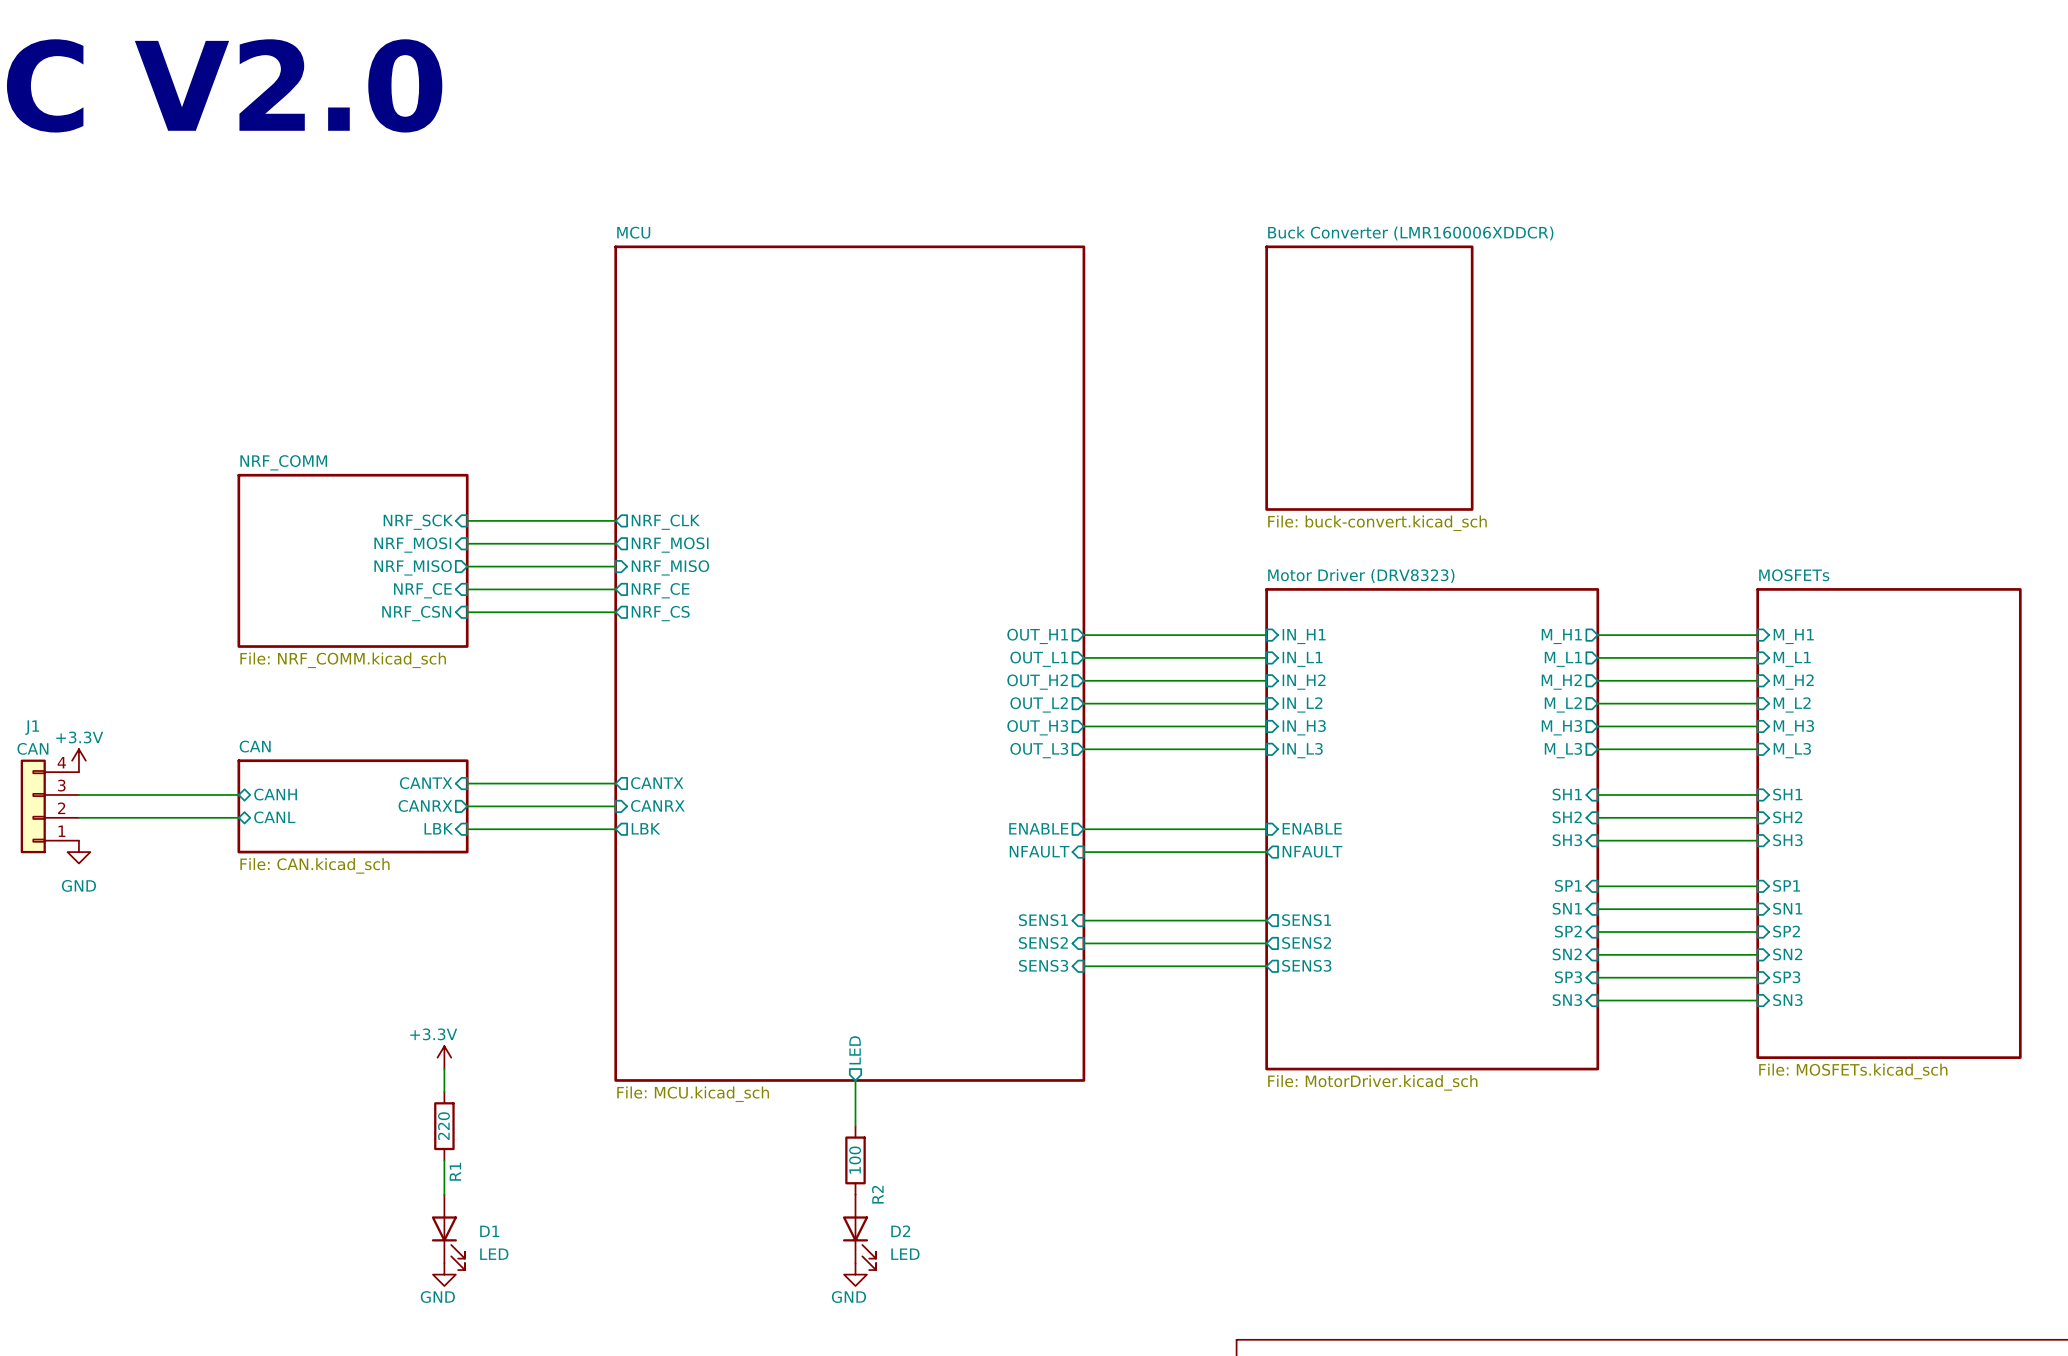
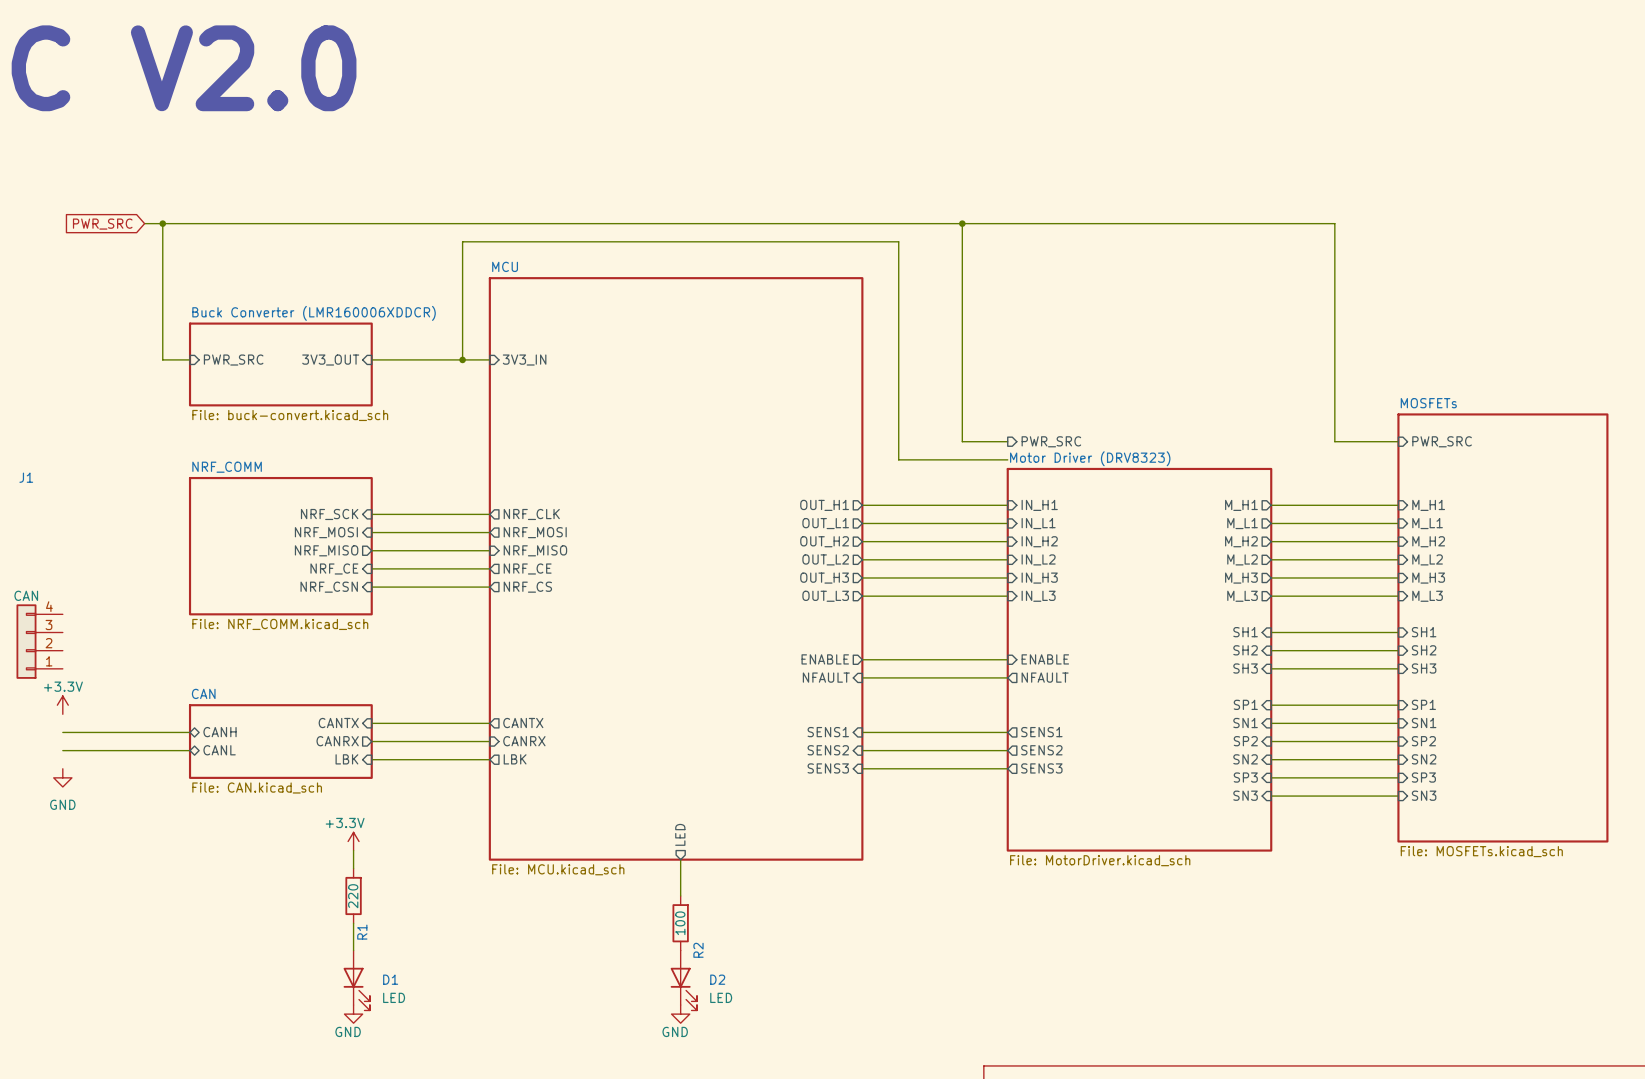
sheet Buck Converter (LMR160006XDDCR) name position: Buck Converter (LMR160006XDDCR) (1410, 233) -> Buck Converter (LMR160006XDDCR) (314, 313)
sheet Buck Converter (LMR160006XDDCR) shape: [1265, 245, 1474, 511] -> [188, 322, 373, 407]
wire: none -> (144, 223) (1334, 223) (1334, 441) (1398, 441)
wire: none -> (162, 223) (162, 359) (190, 359)
junction: none -> (162, 223)
wire: none -> (962, 223) (962, 441) (1007, 441)
junction: none -> (962, 223)
global label: none -> PWR_SRC (102, 224)
wire: none -> (371, 359) (489, 359)
wire: none -> (462, 359) (462, 241) (898, 241) (898, 459) (1007, 459)
junction: none -> (462, 359)
sheet pin: none -> PWR_SRC (233, 360)
sheet pin: none -> 3V3_OUT (330, 360)
sheet pin: none -> 3V3_IN (524, 360)
wire: (467, 520) (615, 520) -> (371, 514) (489, 514)
sheet pin position: NRF_SCK (418, 522) -> NRF_SCK (329, 514)
sheet pin position: NRF_CLK (665, 522) -> NRF_CLK (531, 514)
sheet Buck Converter (LMR160006XDDCR) value position: File: buck-convert.kicad_sch (1377, 523) -> File: buck-convert.kicad_sch (290, 415)
wire: (467, 543) (615, 543) -> (371, 532) (489, 532)
sheet pin: NRF_MOSI (412, 545) -> none
sheet pin: NRF_MOSI (670, 545) -> none
sheet pin: none -> PWR_SRC (1051, 441)
sheet pin: none -> PWR_SRC (1442, 441)
sheet NRF_COMM position: (353, 560) -> (280, 546)
wire: (467, 566) (615, 566) -> (371, 550) (489, 550)
sheet pin: NRF_MISO (413, 567) -> none
sheet pin: NRF_MISO (670, 567) -> none
wire: (467, 589) (615, 589) -> (371, 568) (489, 568)
sheet pin: NRF_CE (422, 590) -> none
sheet pin: NRF_CE (660, 590) -> none
wire: (467, 612) (615, 612) -> (371, 587) (489, 587)
sheet pin position: NRF_CSN (416, 613) -> NRF_CSN (329, 587)
sheet pin position: NRF_CS (660, 613) -> NRF_CS (527, 587)
sheet MCU: File: MCU.kicad_sch (849, 663) -> none
sheet pin: none -> NRF_MOSI (326, 532)
sheet pin: none -> NRF_MOSI (535, 532)
sheet pin: none -> NRF_MISO (326, 550)
sheet pin: none -> NRF_MISO (535, 550)
sheet MCU: none -> File: MCU.kicad_sch (676, 568)
sheet pin: none -> NRF_CE (334, 568)
sheet pin: none -> NRF_CE (527, 568)
J1 name position: J1 (32, 727) -> J1 (26, 477)
power symbol position: +3.3V (78, 760) -> +3.3V (62, 705)
sheet pin: CANTX (426, 783) -> none
wire: (467, 783) (615, 783) -> (371, 723) (489, 723)
sheet pin: CANTX (657, 783) -> none
sheet MOSFETs: none -> File: MOSFETs.kicad_sch (1502, 627)
wire: (78, 794) (238, 794) -> (62, 732) (190, 732)
sheet pin position: CANH (275, 794) -> CANH (220, 732)
sheet pin: CANRX (425, 805) -> none
sheet pin: CANRX (657, 805) -> none
sheet CAN position: (353, 806) -> (280, 741)
wire: (467, 806) (615, 806) -> (371, 741) (489, 741)
wire: (78, 817) (238, 817) -> (62, 750) (190, 750)
sheet pin position: CANL (274, 817) -> CANL (219, 750)
sheet MOSFETs: File: MOSFETs.kicad_sch (1889, 823) -> none
sheet pin: LBK (438, 828) -> none
sheet pin: LBK (645, 828) -> none
wire: (467, 829) (615, 829) -> (371, 759) (489, 759)
power symbol position: GND (78, 852) -> GND (62, 777)
sheet pin: none -> CANTX (338, 723)
sheet pin: none -> CANTX (523, 723)
sheet pin: none -> CANRX (337, 741)
sheet pin: none -> CANRX (524, 741)
sheet pin: none -> LBK (346, 759)
sheet pin: none -> LBK (515, 759)

